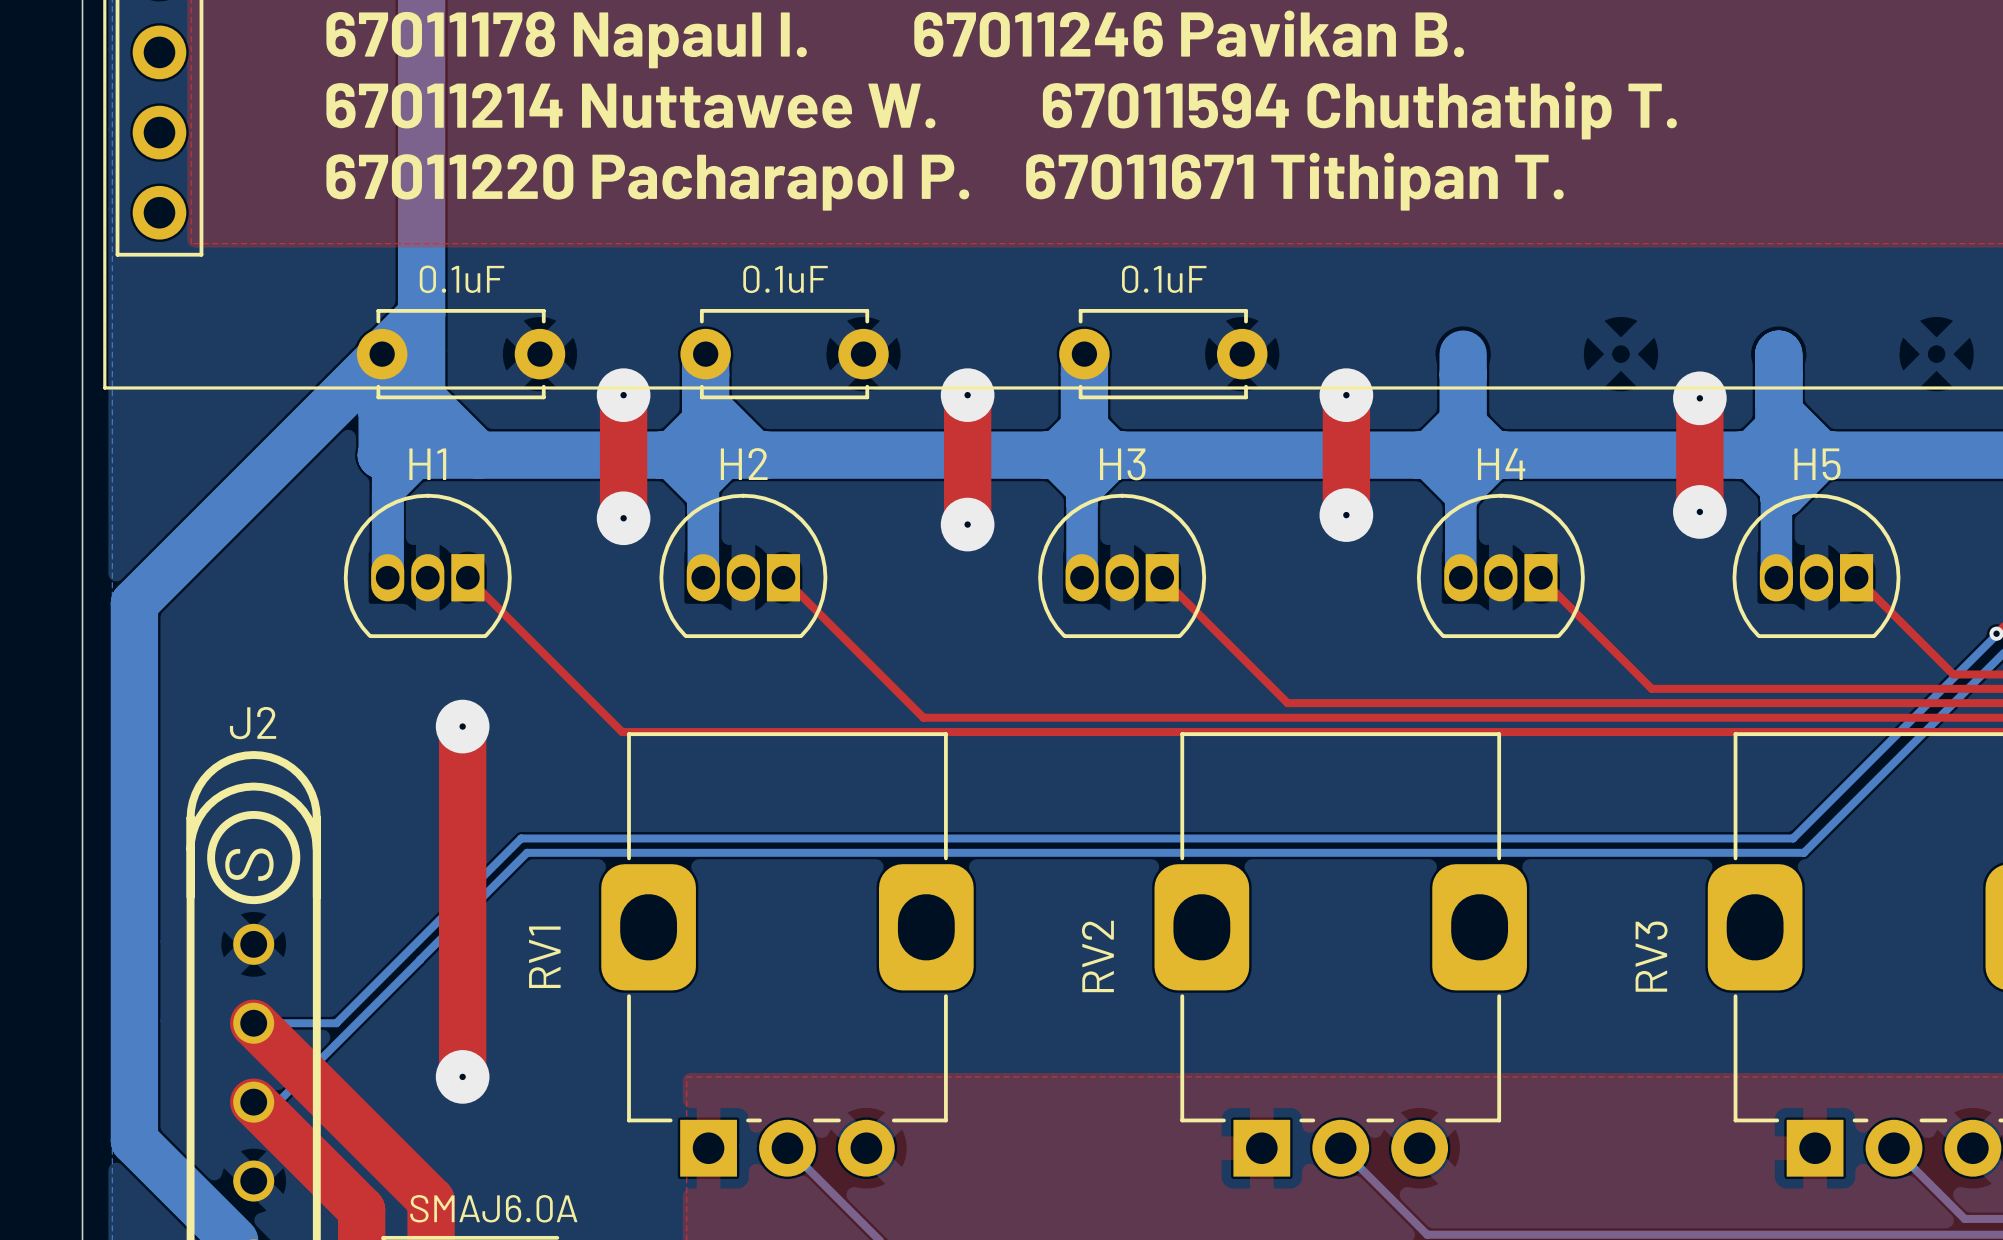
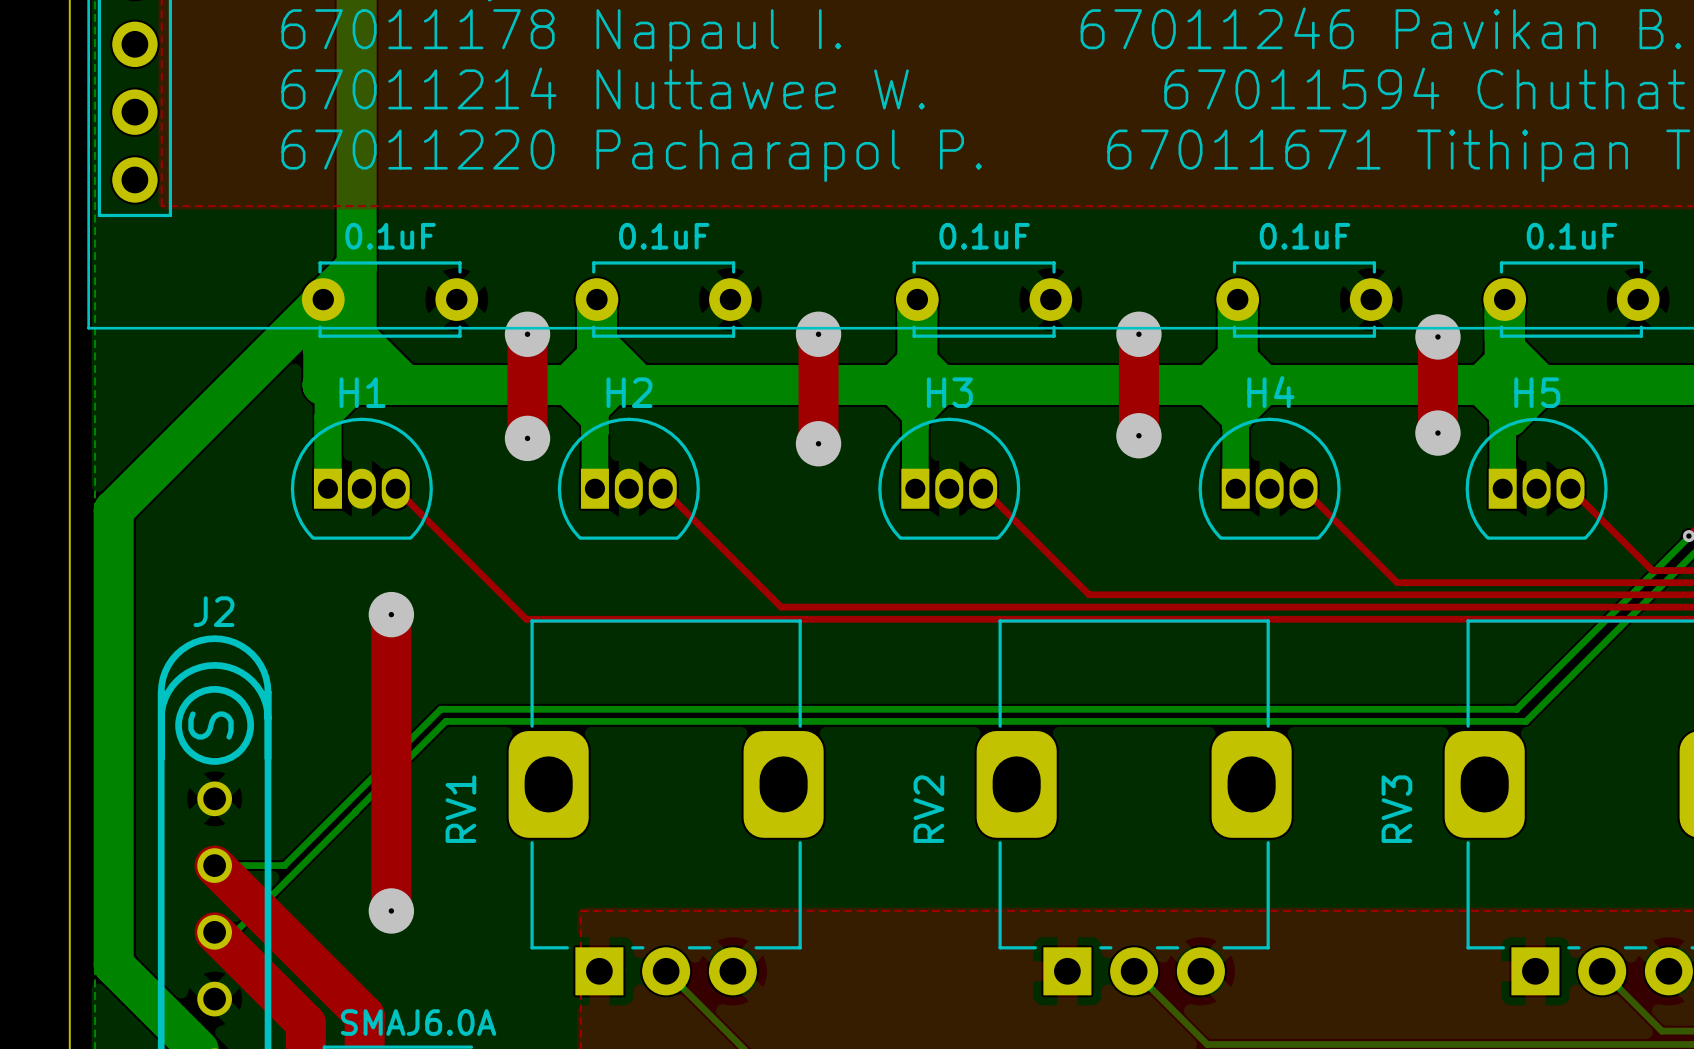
part: none -> 0.1uF (1304, 299)
part: none -> 0.1uF (1571, 299)
H1 footprint: [343, 493, 512, 639] -> [290, 417, 433, 540]
H2 footprint: [659, 493, 828, 639] -> [557, 417, 700, 540]
H3 footprint: [1038, 493, 1207, 639] -> [878, 417, 1021, 540]
H4 footprint: [1416, 493, 1585, 639] -> [1198, 417, 1341, 540]
H5 footprint: [1732, 493, 1901, 639] -> [1465, 417, 1608, 540]

